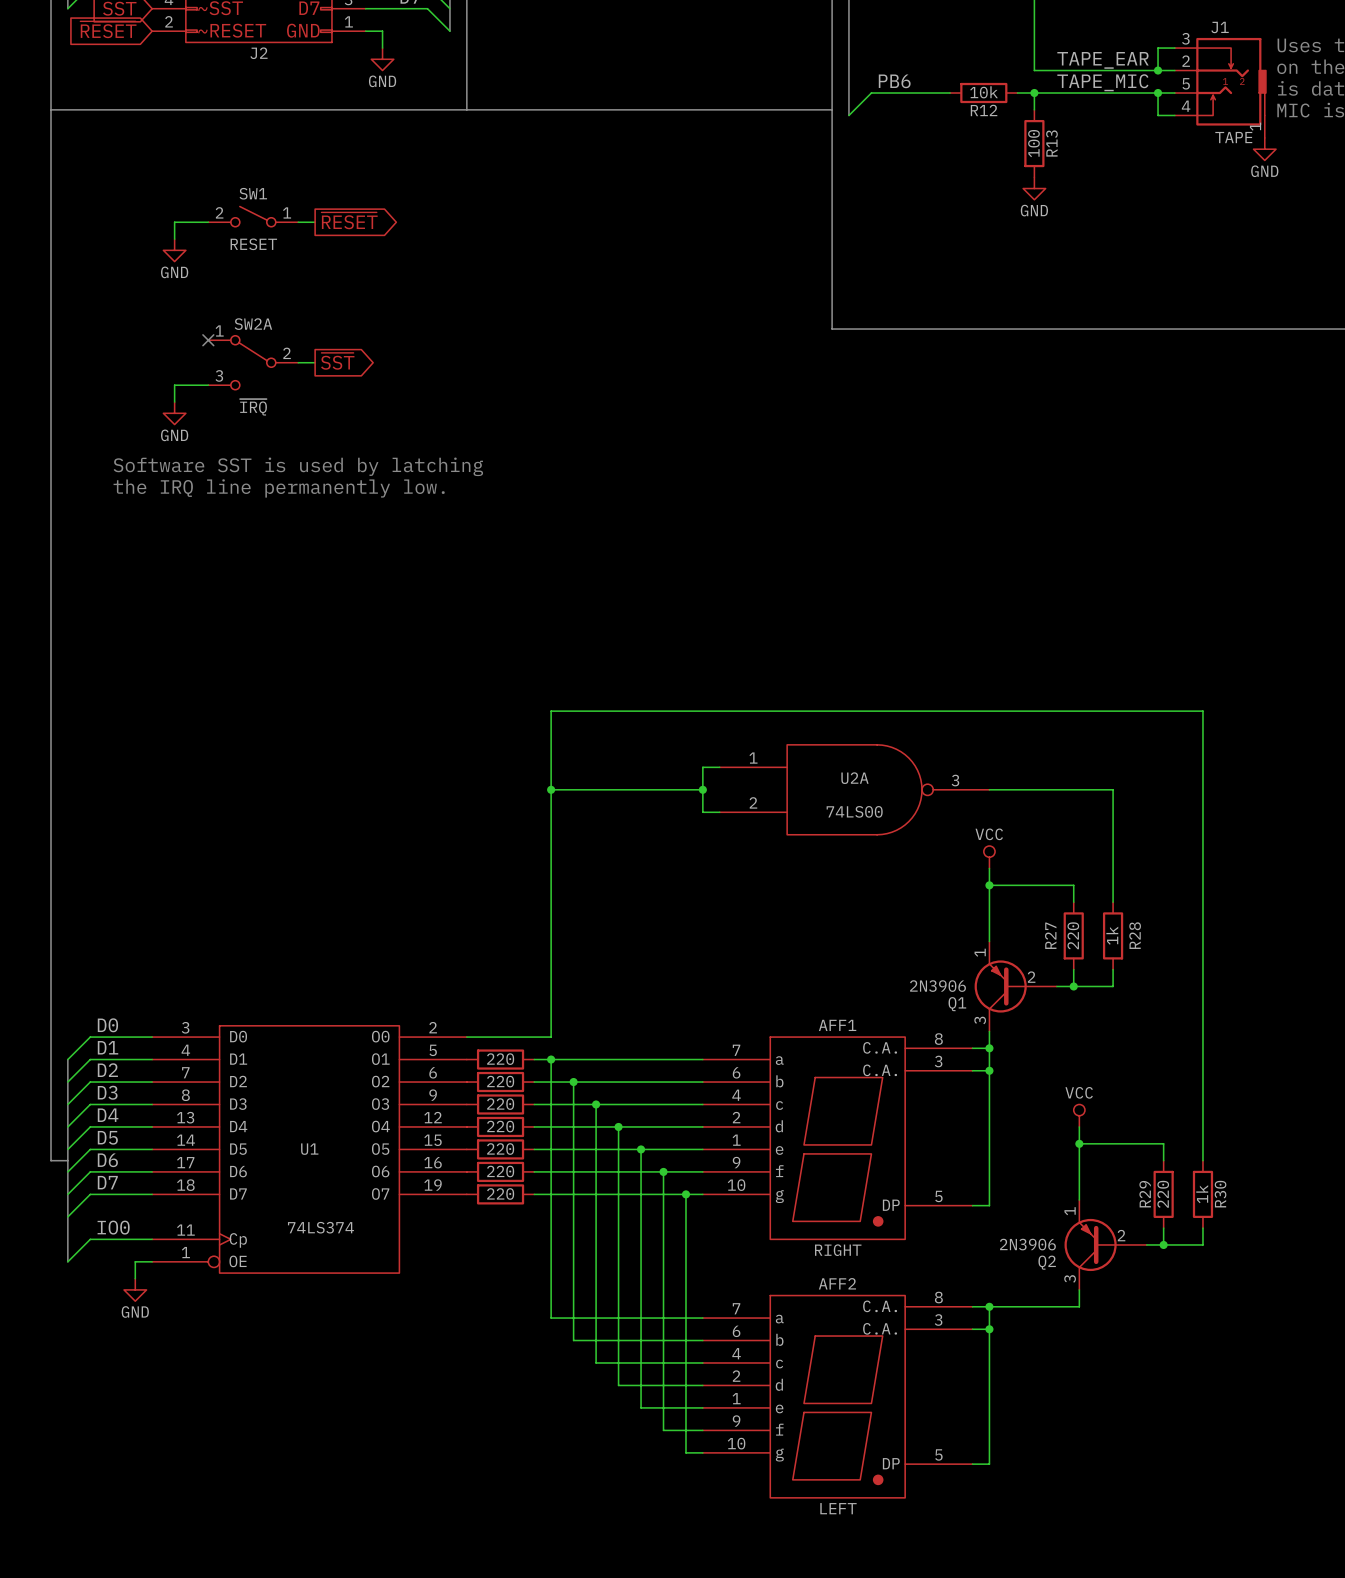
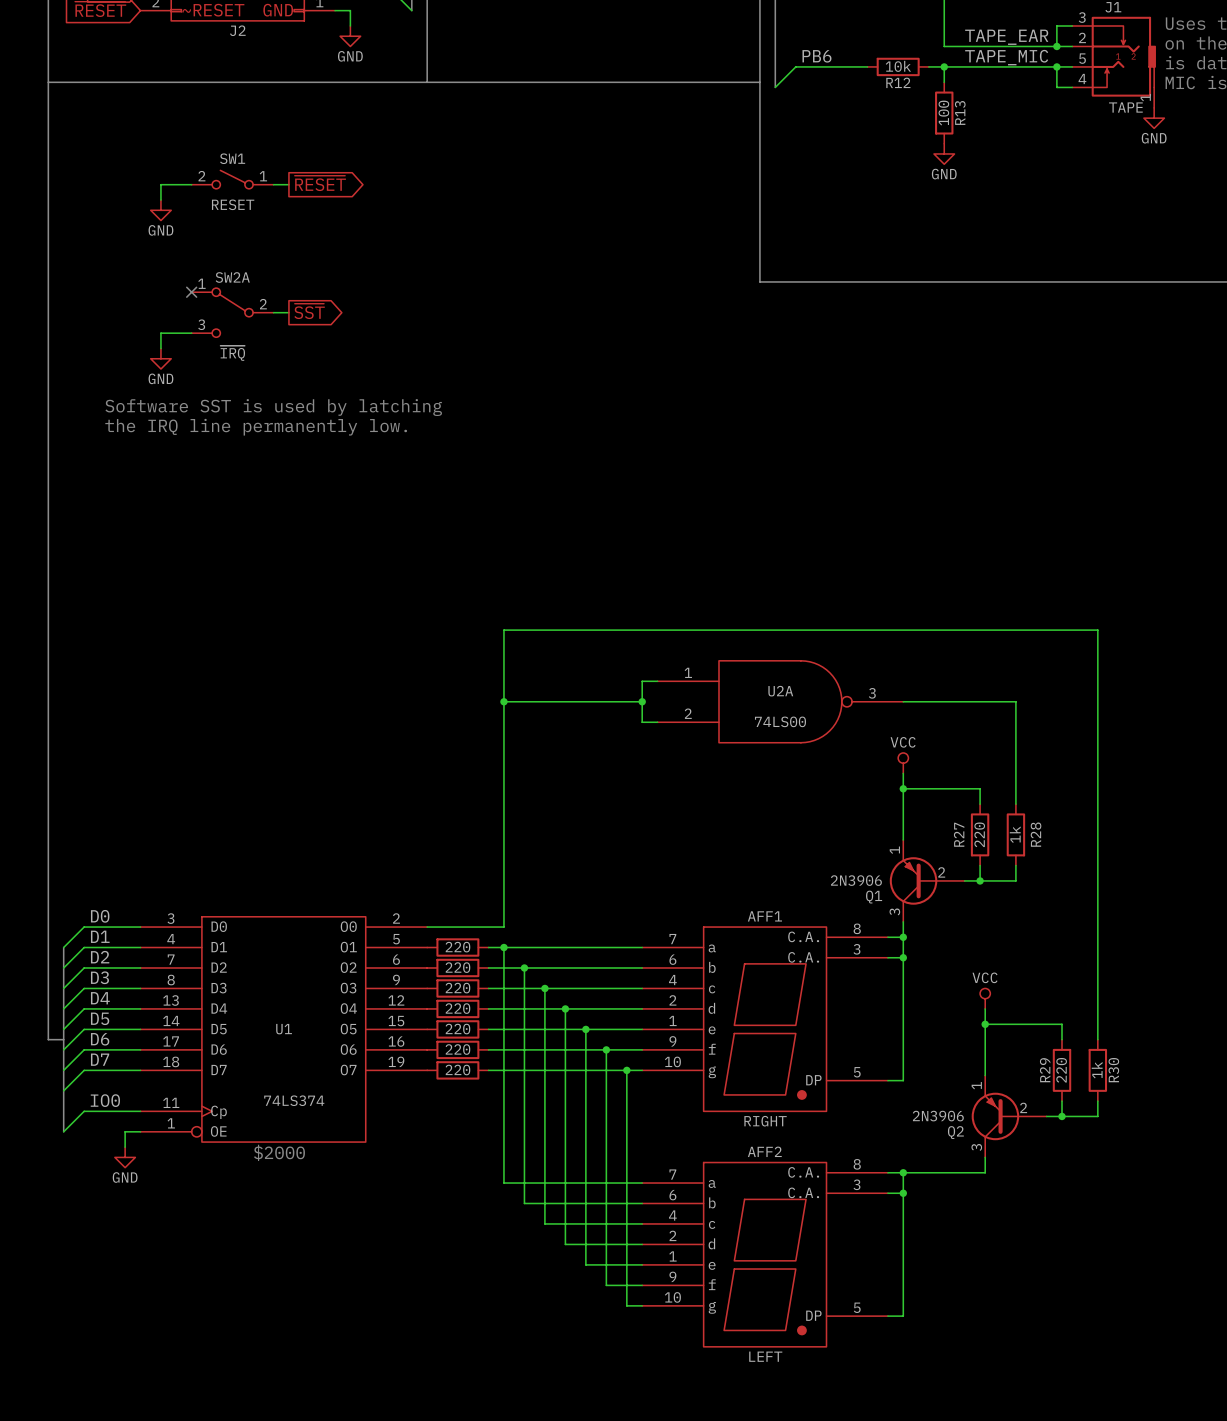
text: none -> $2000 (279, 1152)

